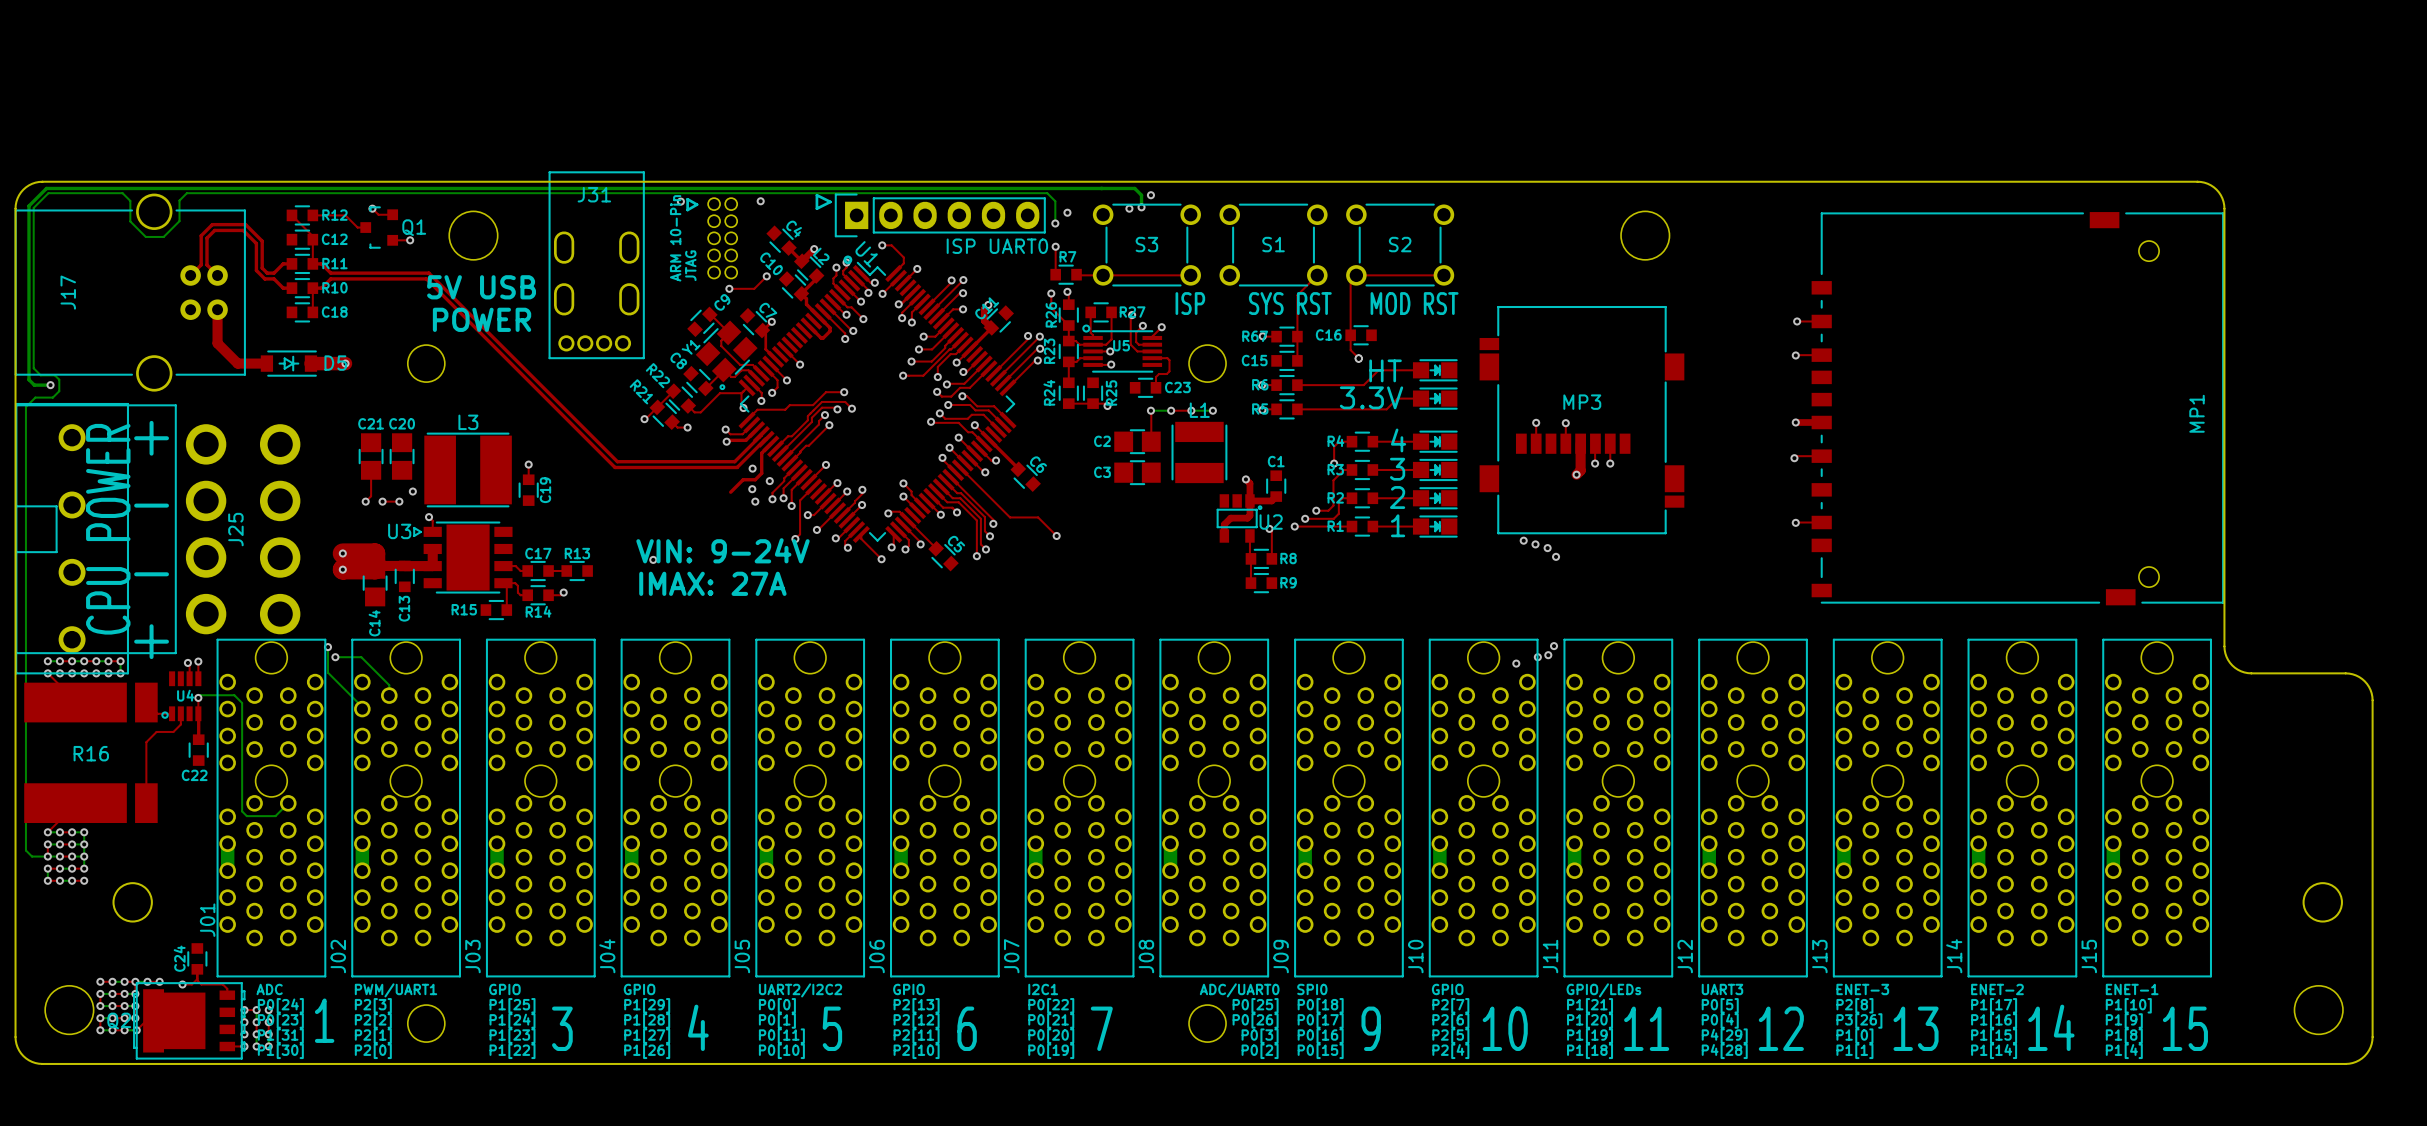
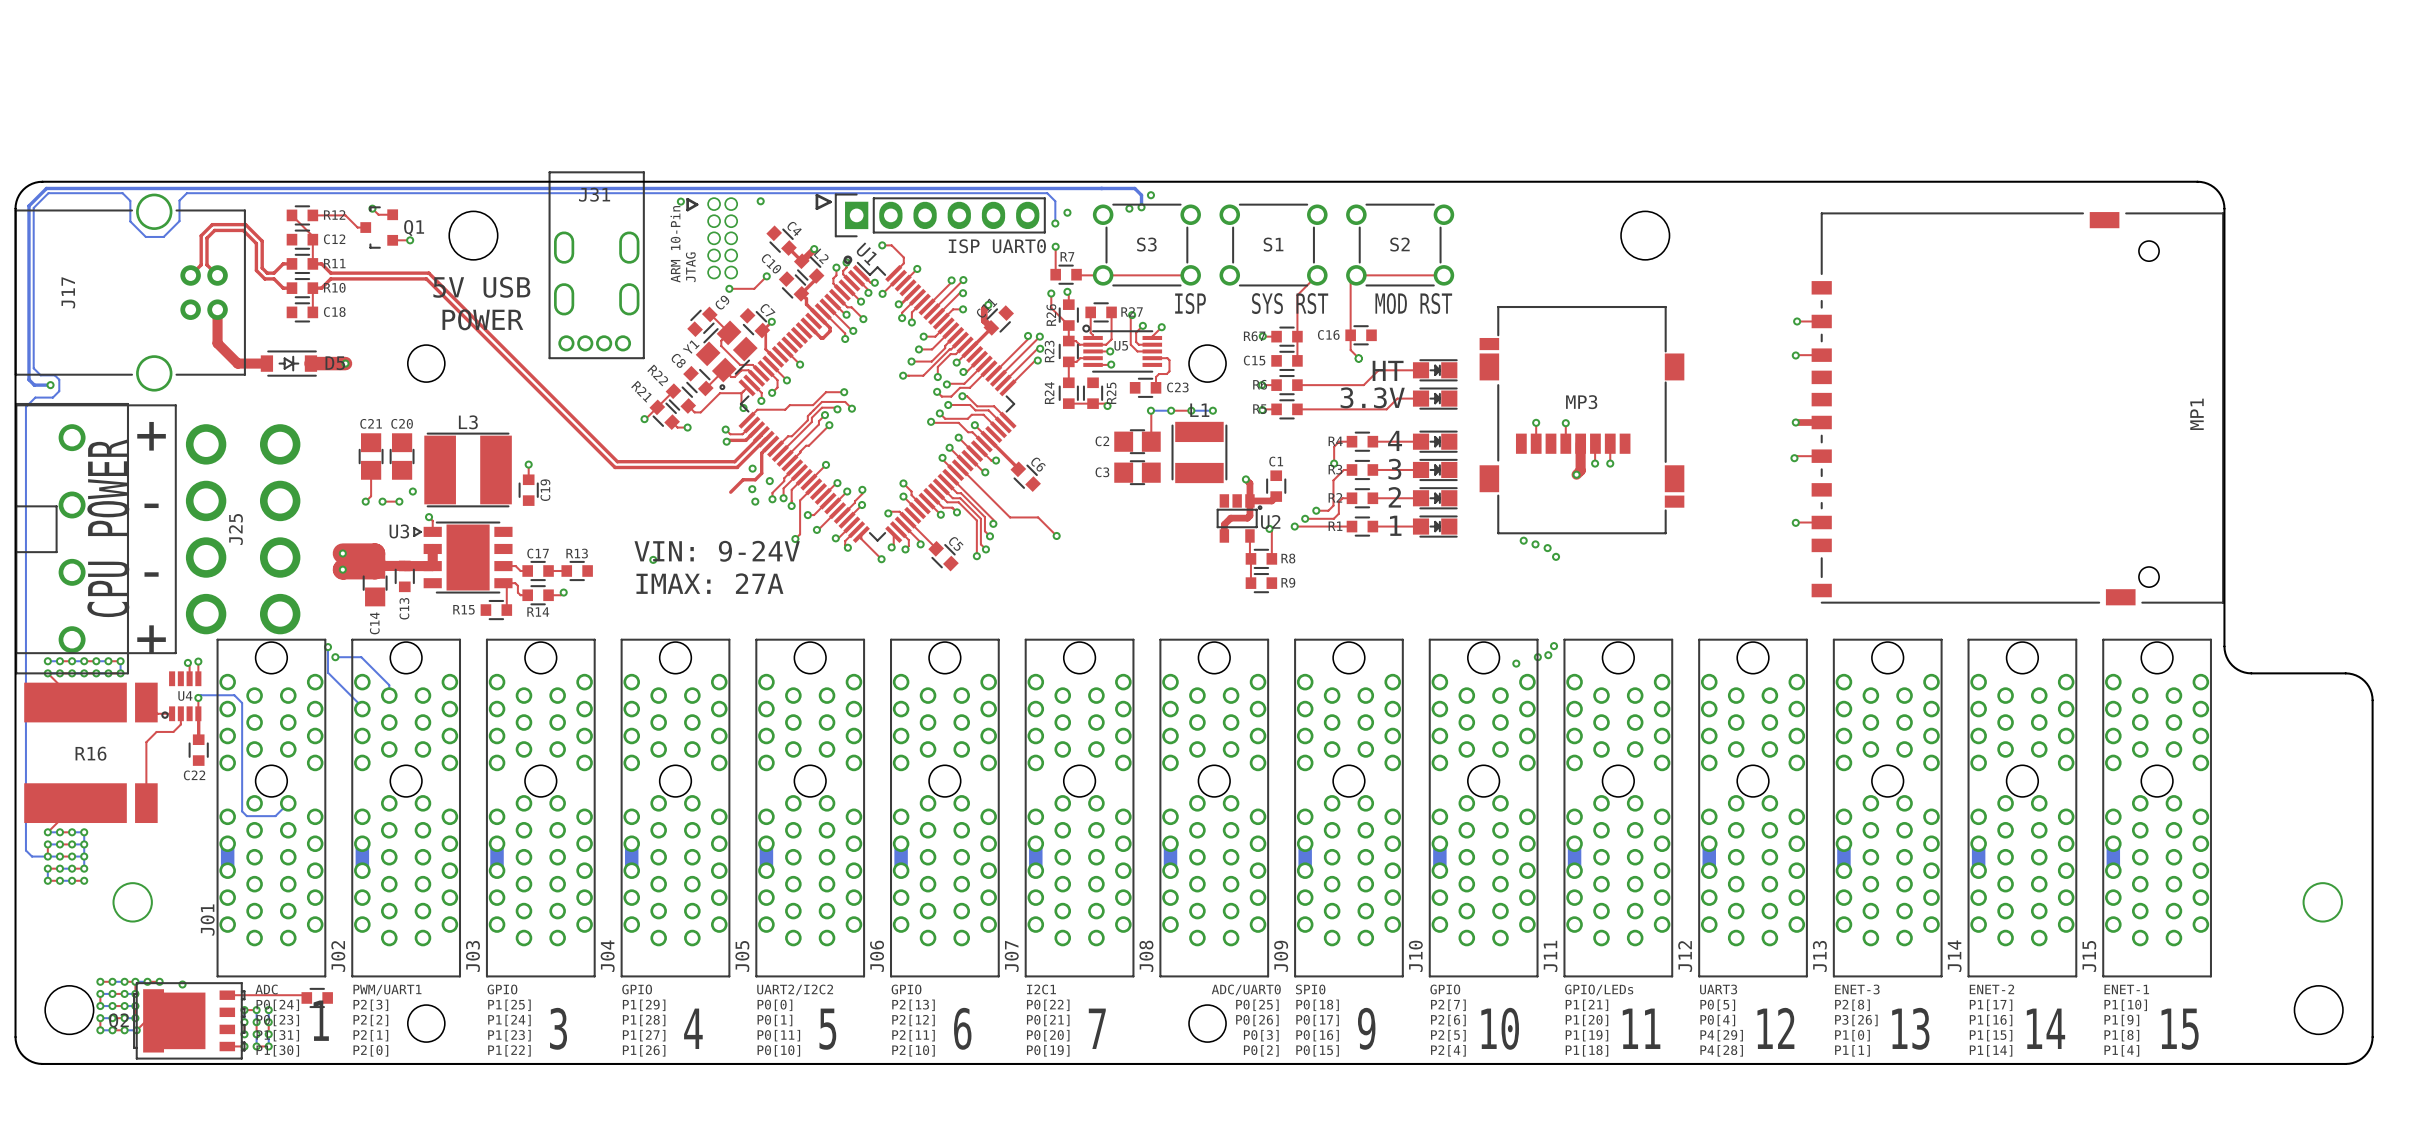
C24: (197, 958) -> none
top track: (197, 969) (197, 980) (201, 984) (222, 984) (227, 988) (227, 995) -> (306, 997) (304, 995) (227, 995)
top track: (197, 979) (191, 984) (182, 984) -> none
part: none -> (317, 997)

